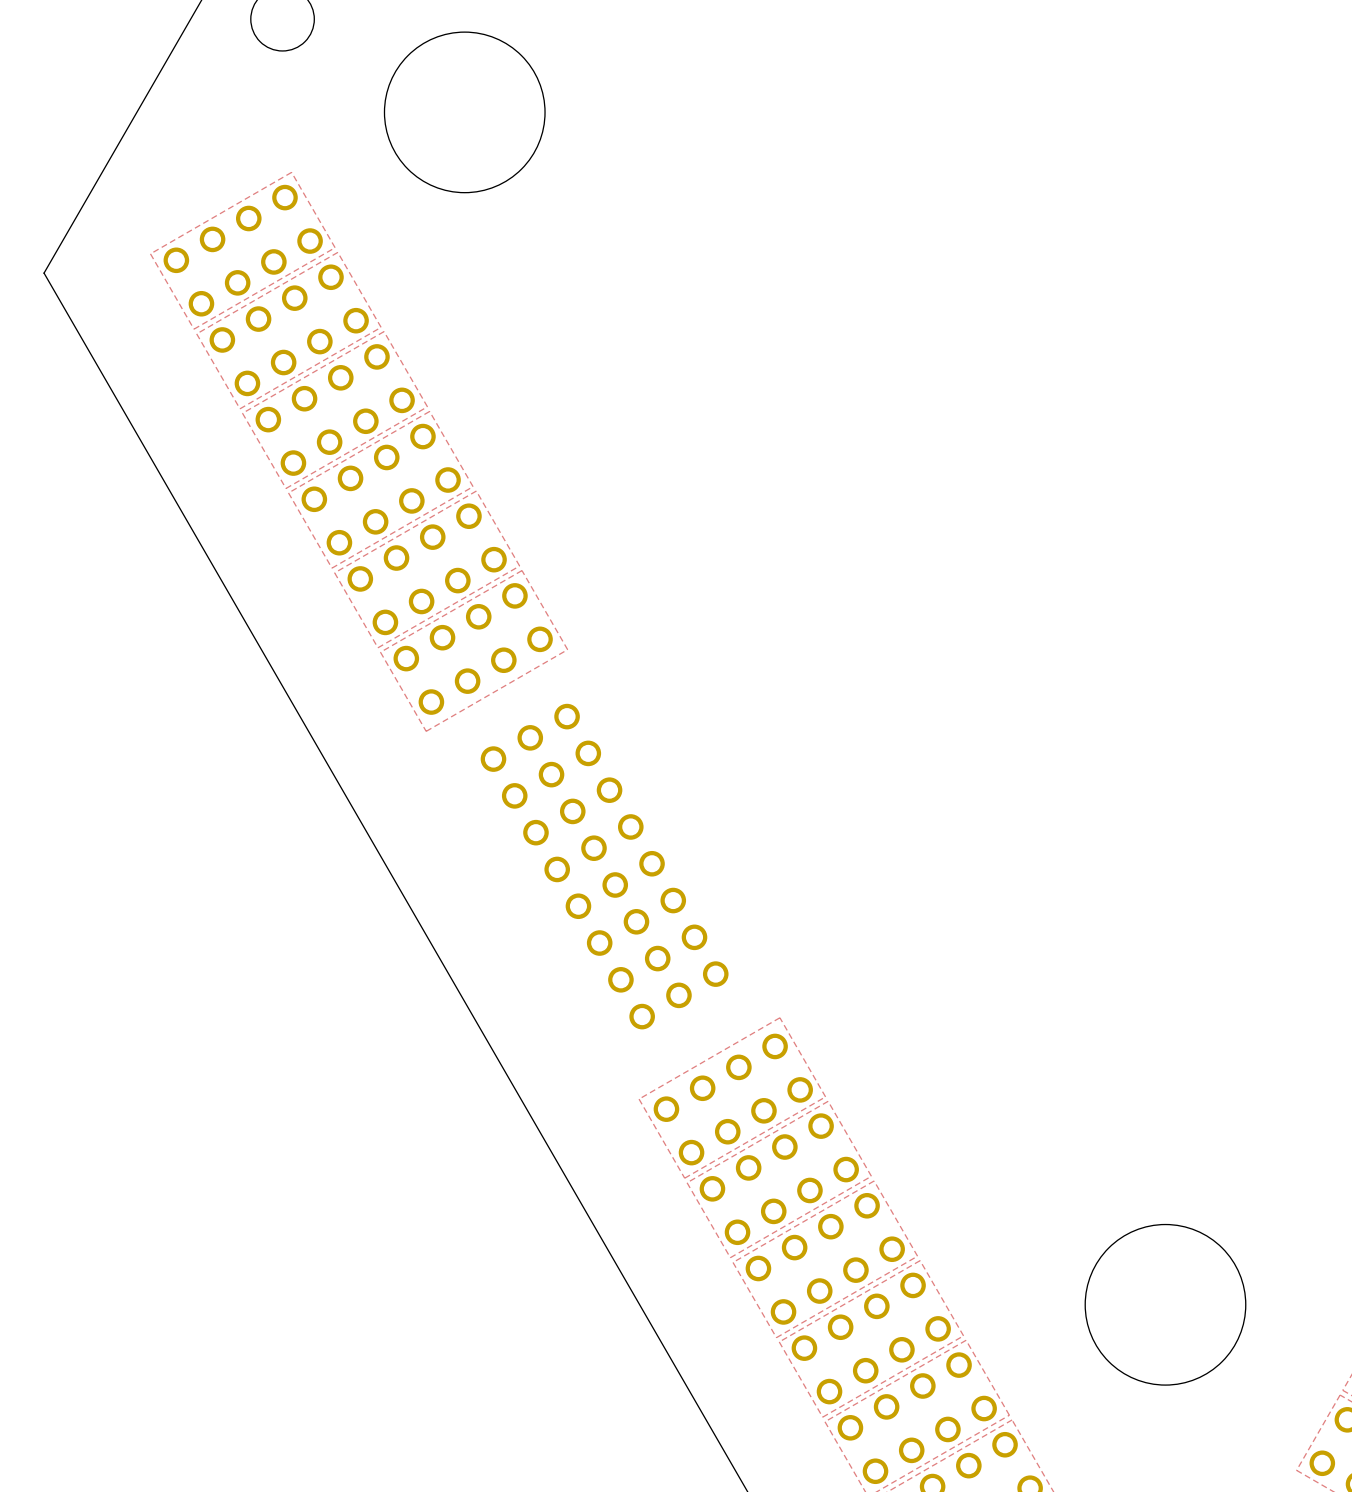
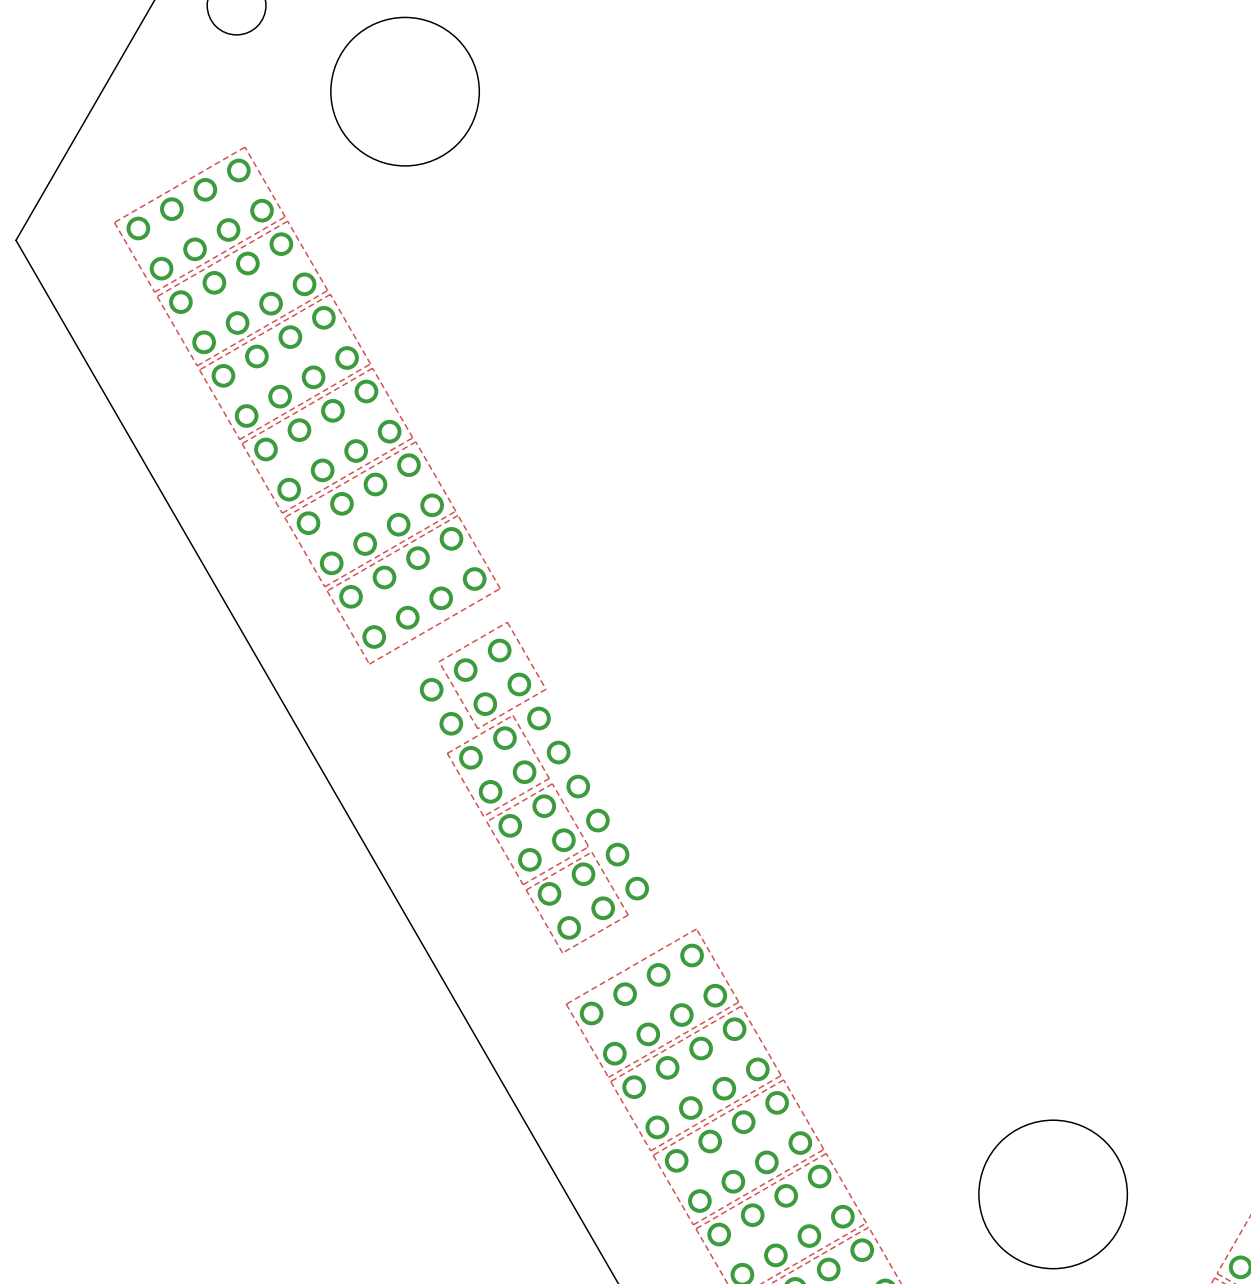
top zone outline: none -> (507, 622) (439, 661) (477, 728) (546, 689) (507, 622)
top zone outline: none -> (512, 715) (549, 778) (483, 816) (447, 753) (512, 715)
top zone outline: none -> (552, 783) (587, 845) (587, 847) (523, 884) (486, 821) (552, 783)
top zone outline: none -> (591, 852) (628, 915) (562, 952) (526, 890) (591, 852)

